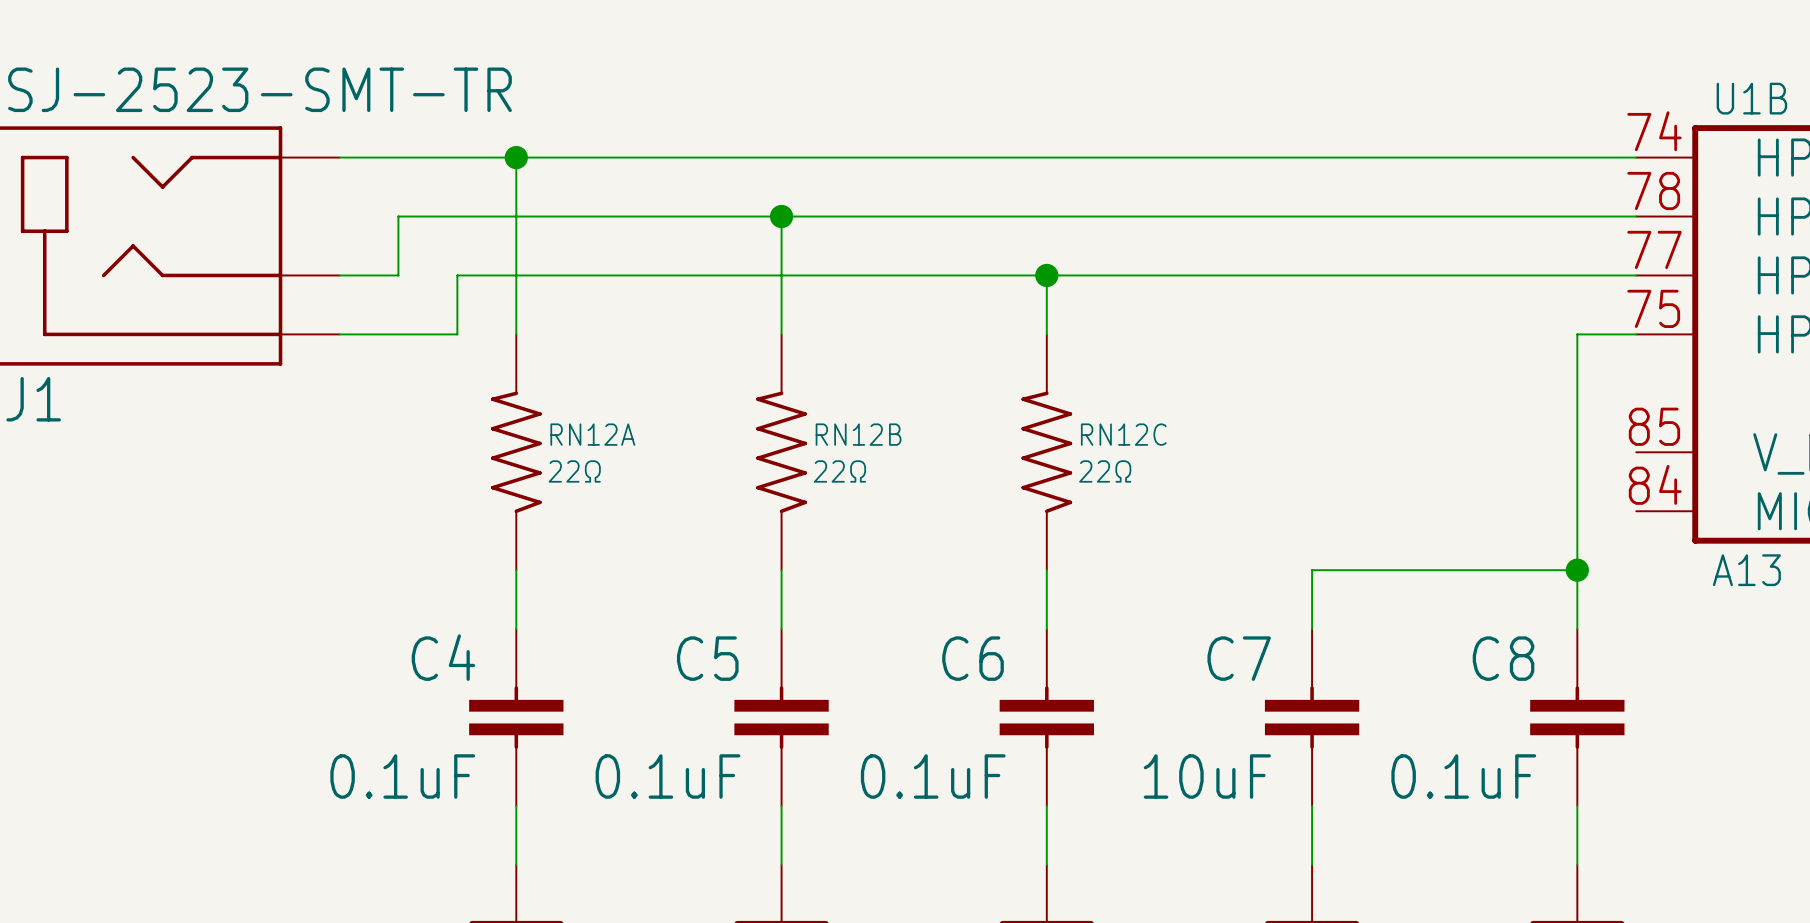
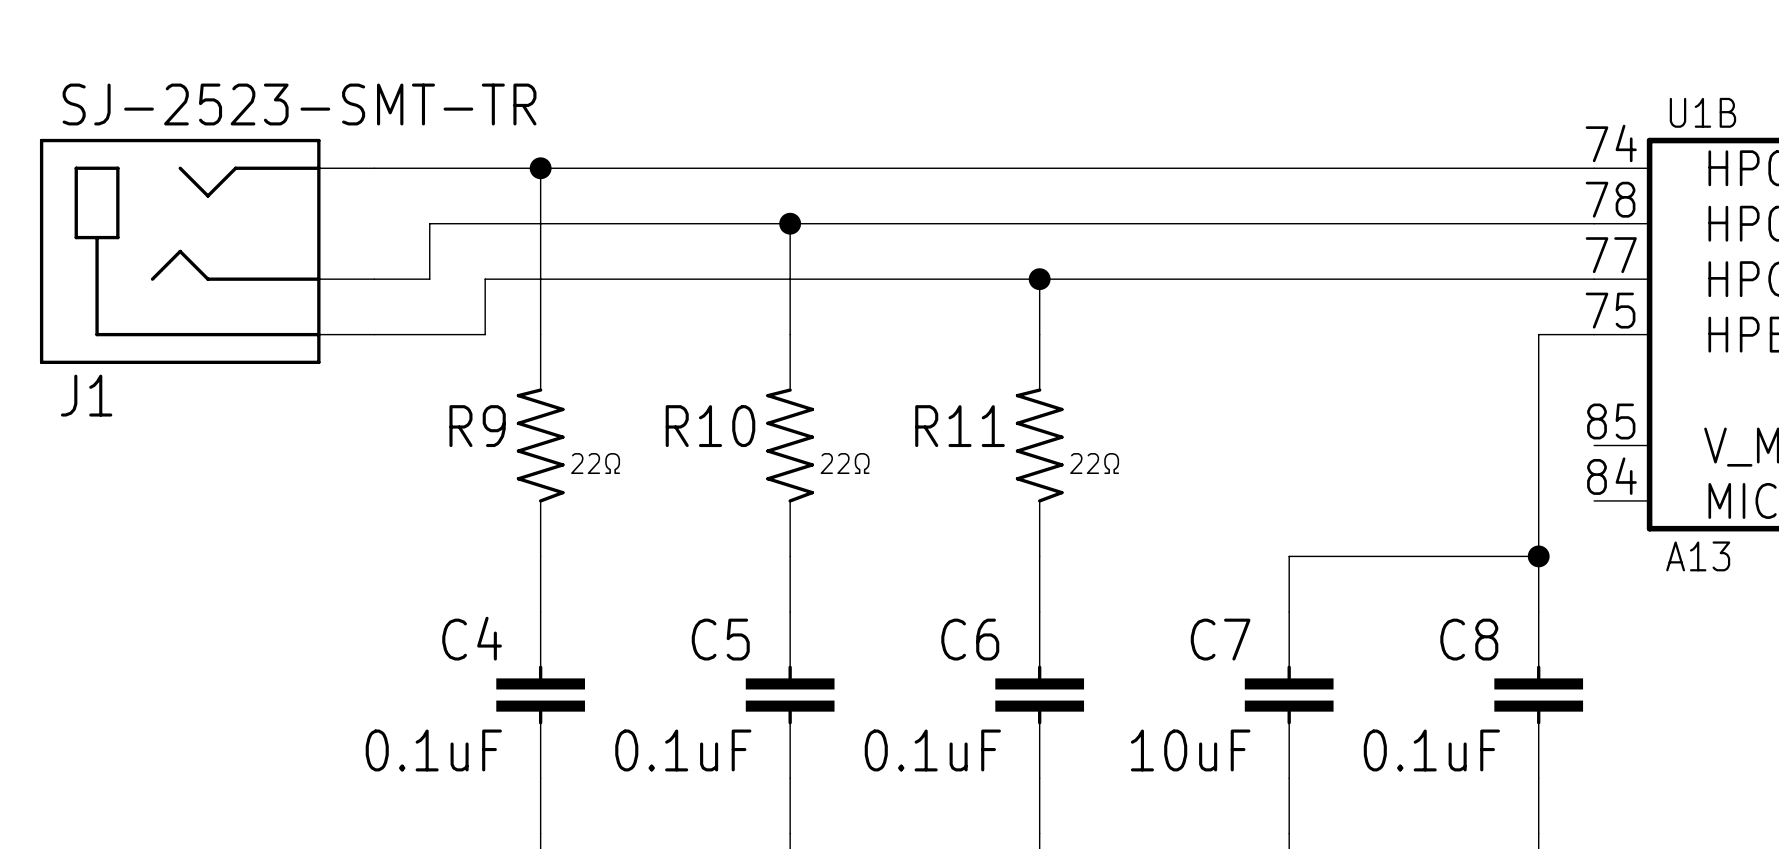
RN12A name: RN12A (592, 434) -> R9 (477, 426)
RN12B name: RN12B (858, 434) -> R10 (710, 426)
RN12C name: RN12C (1123, 434) -> R11 (960, 426)

